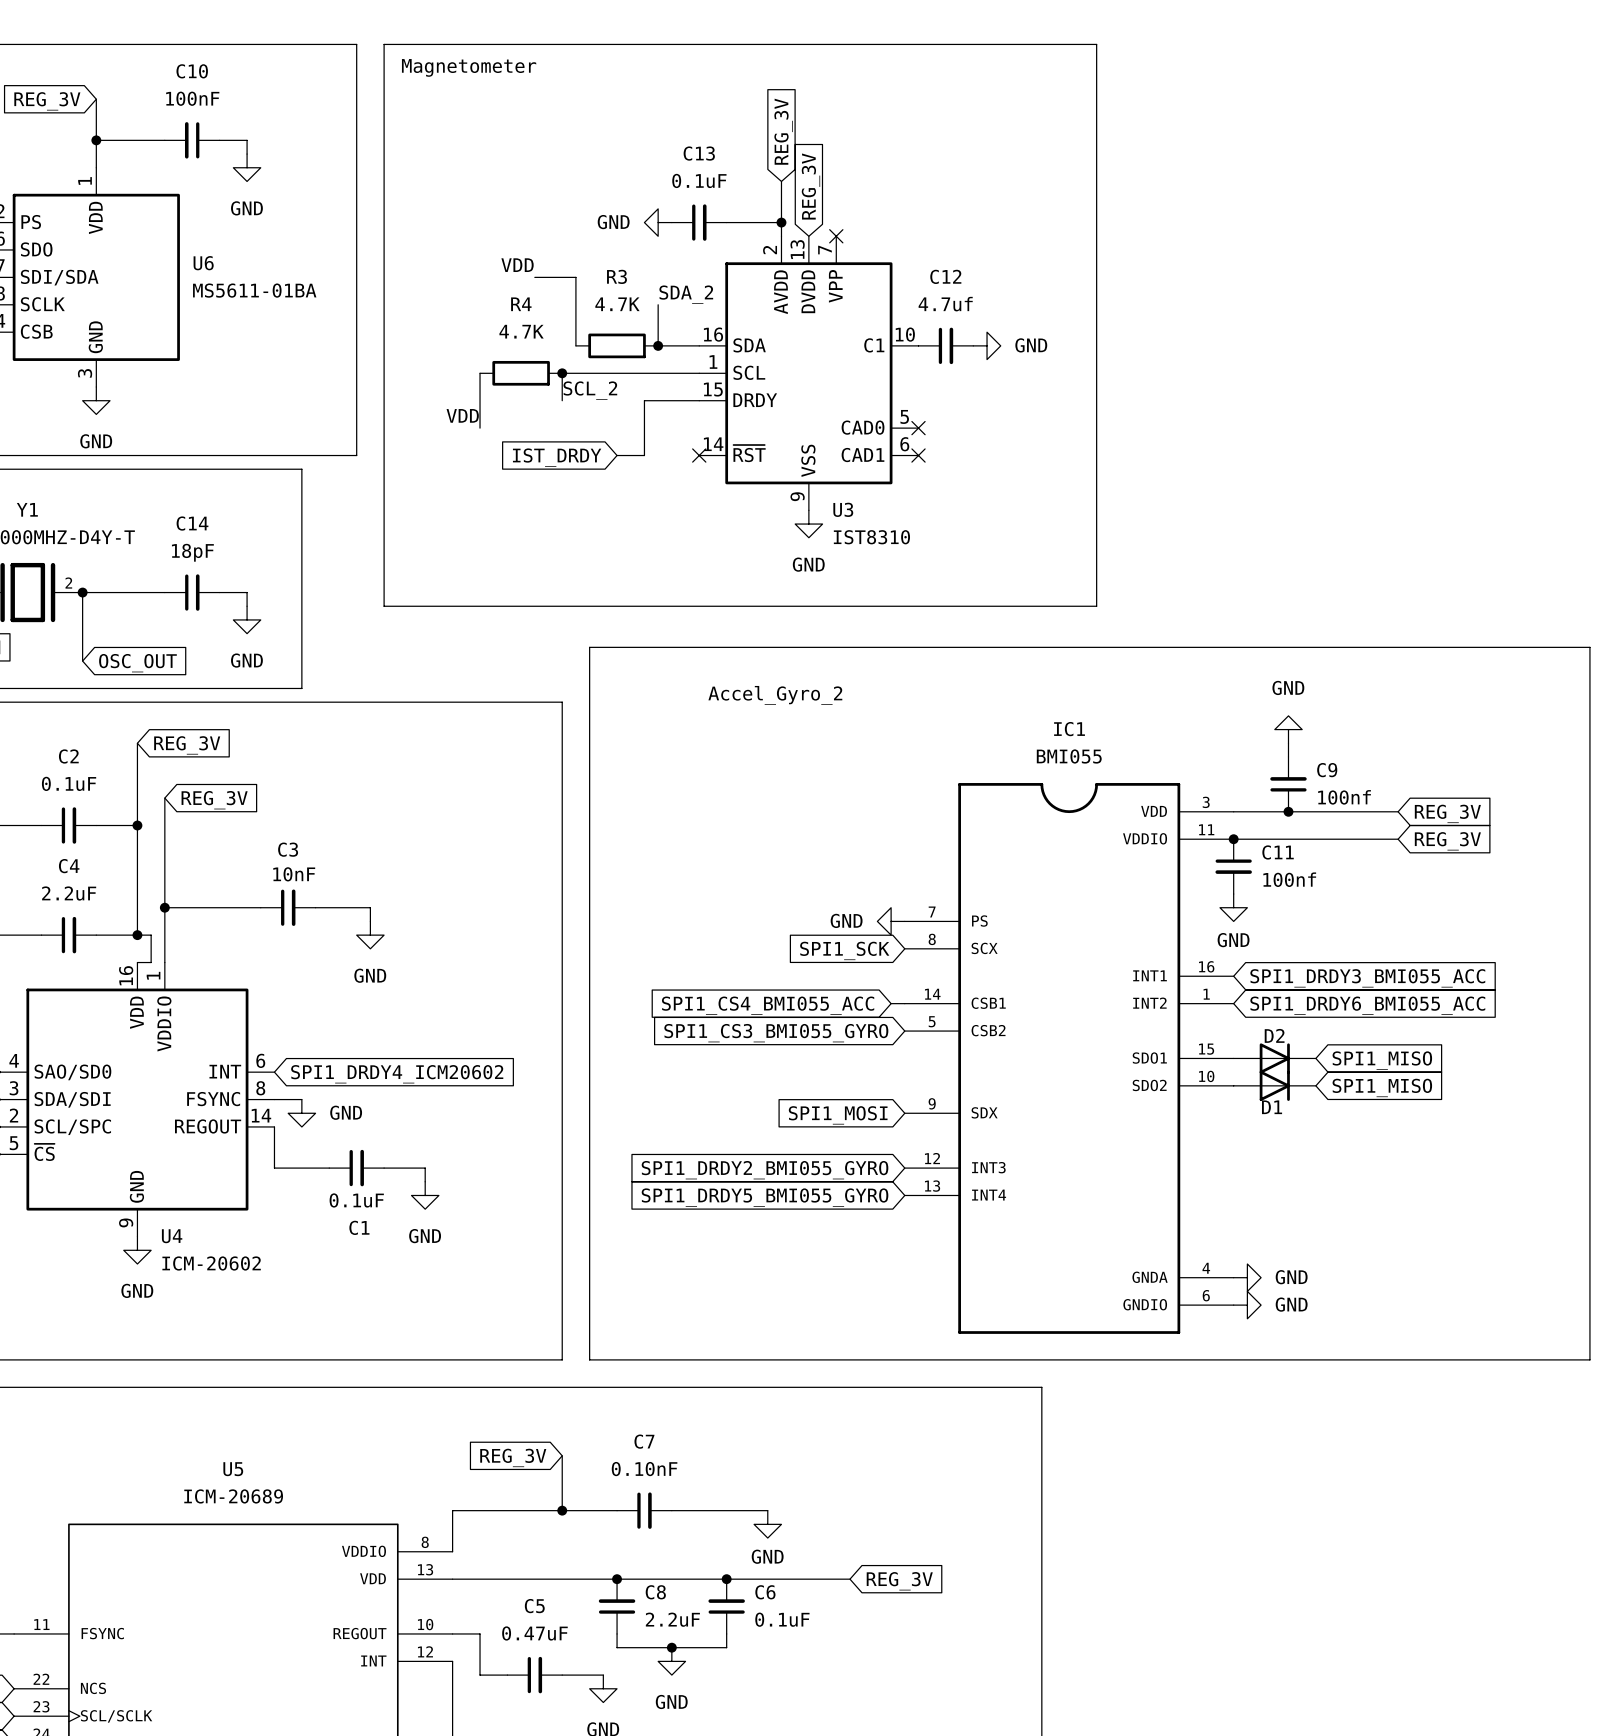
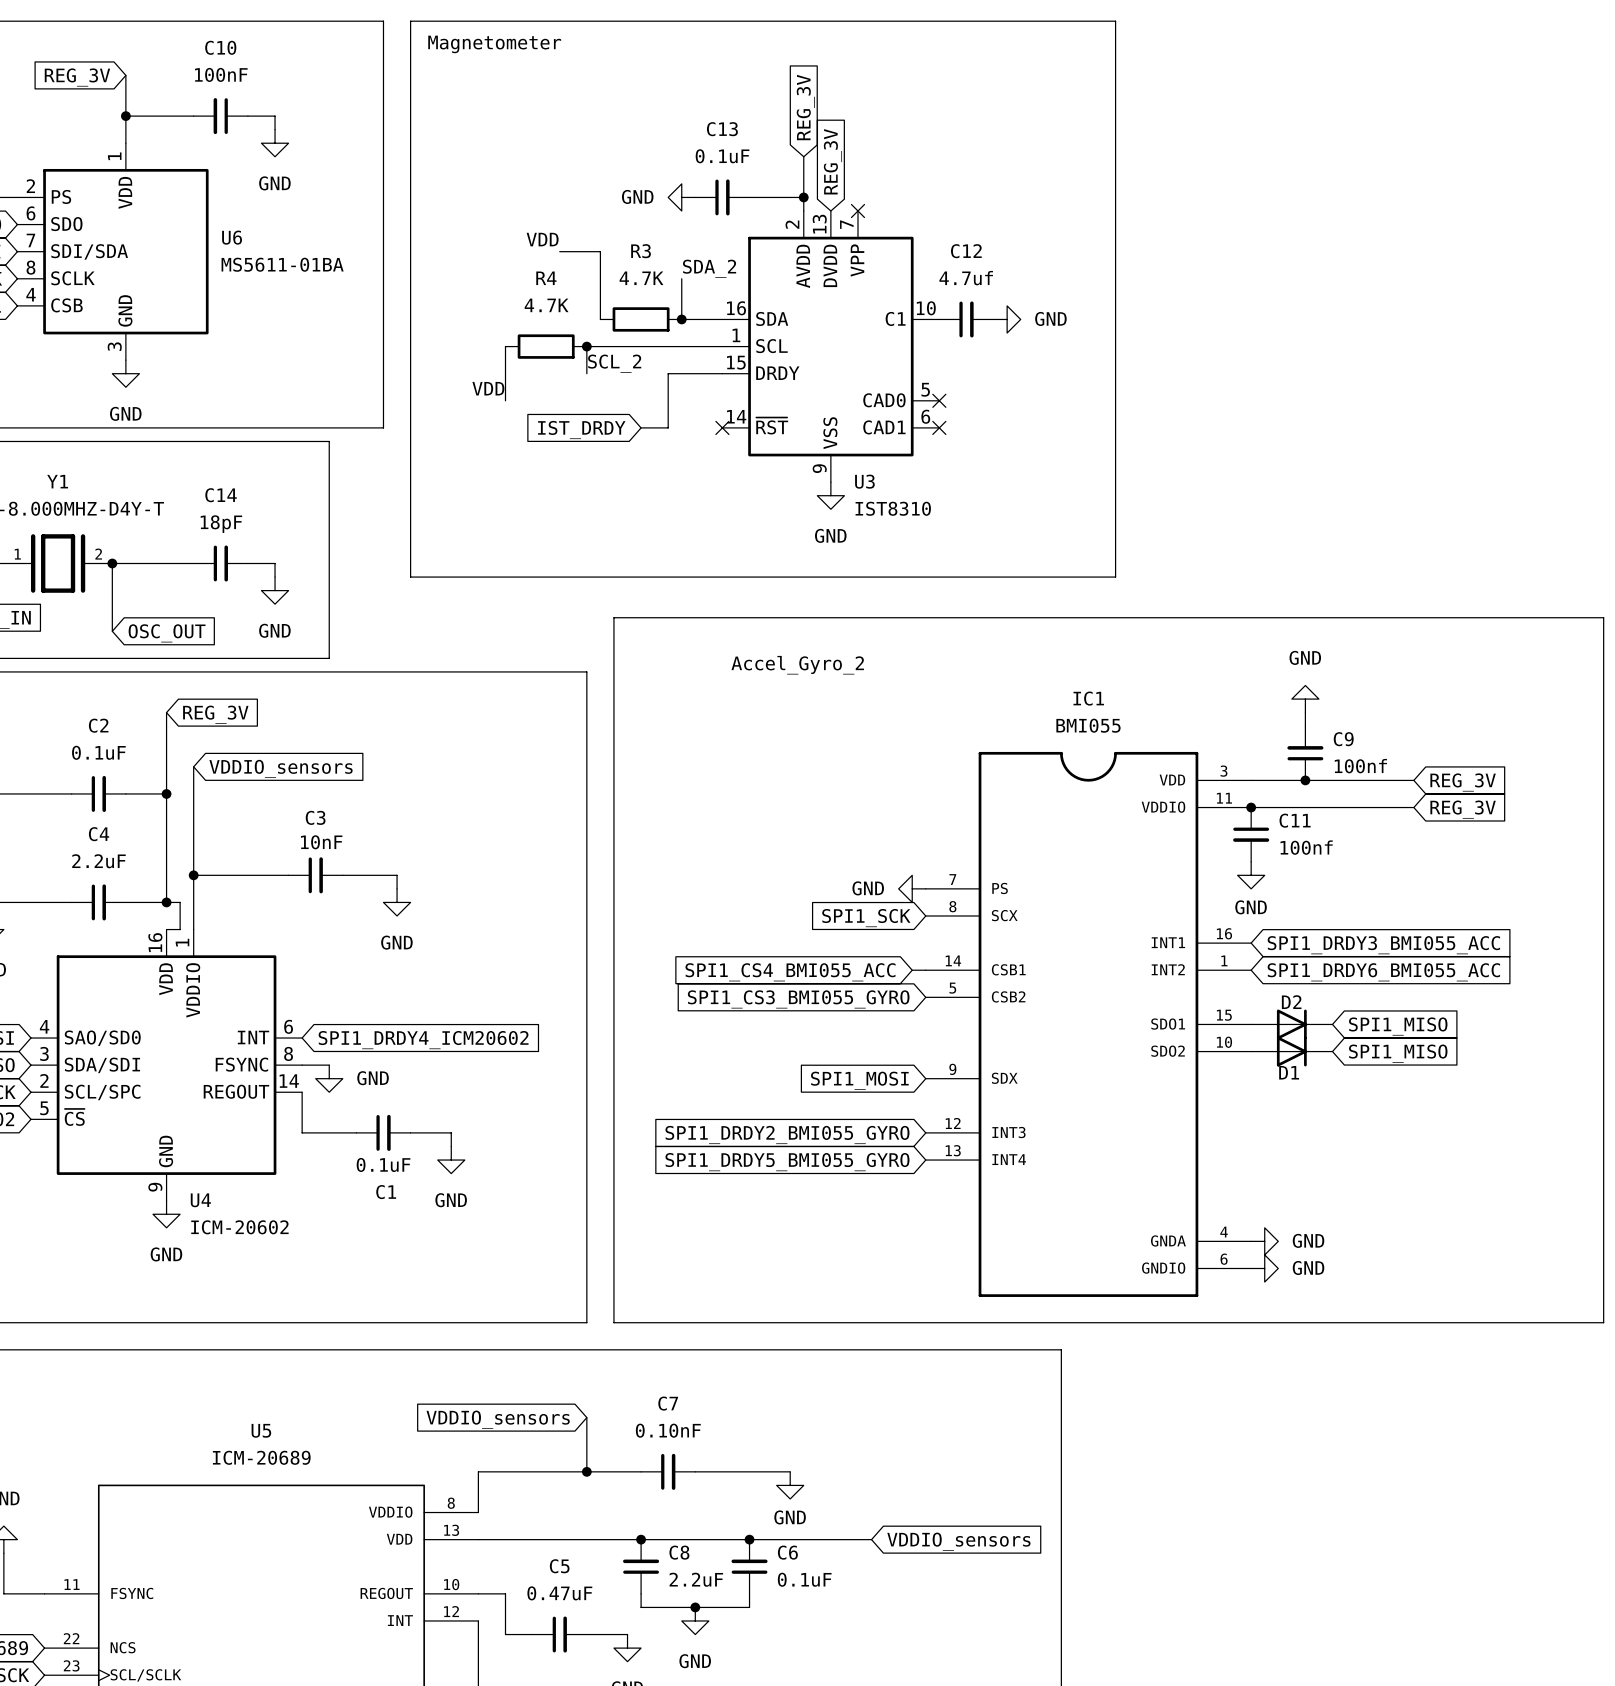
global label: REG_3V (214, 800) -> VDDIO_sensors (281, 768)
global label: REG_3V (513, 1457) -> VDDIO_sensors (498, 1419)
global label: REG_3V (899, 1581) -> VDDIO_sensors (958, 1541)

